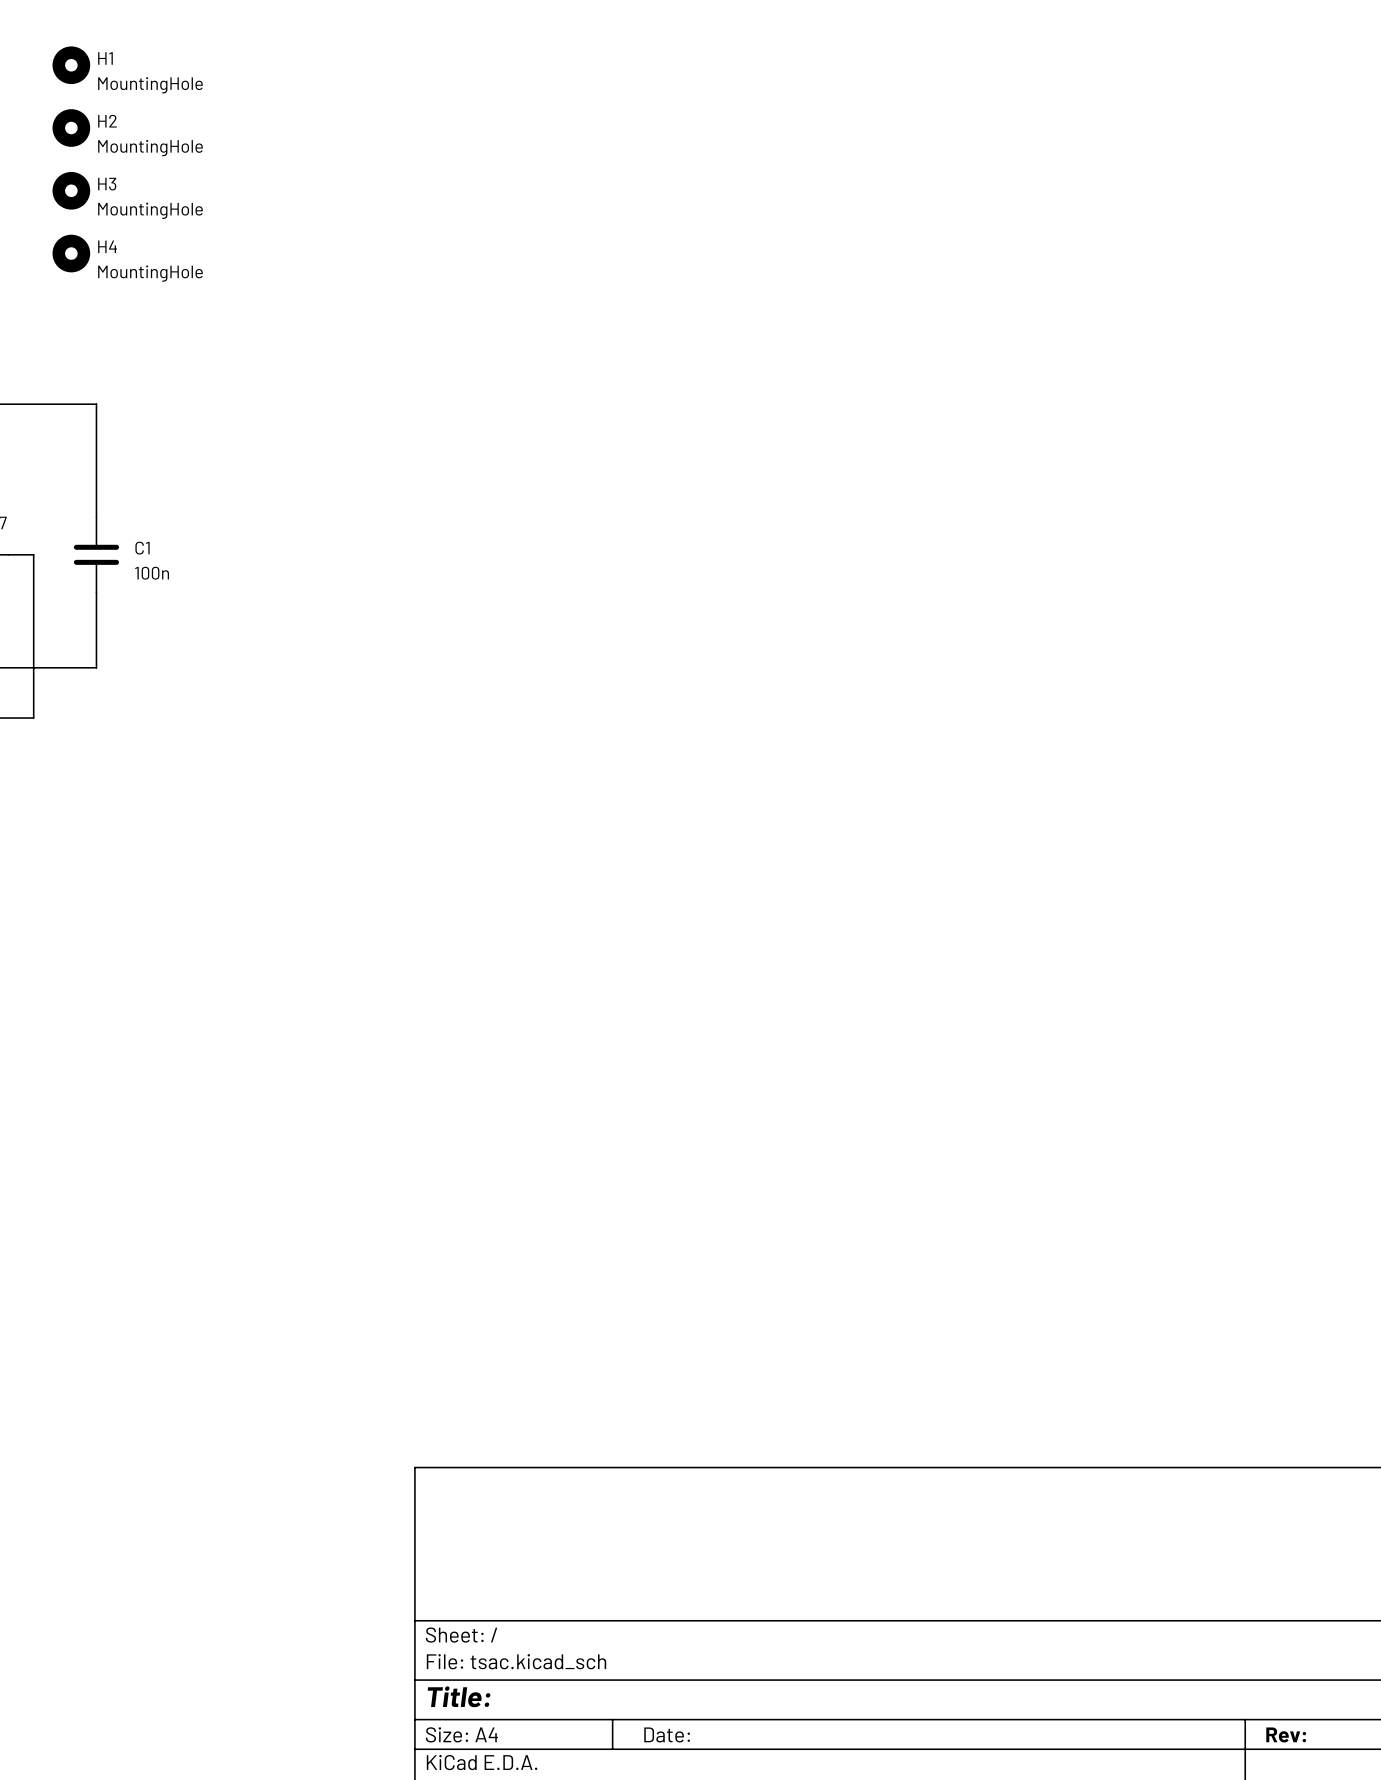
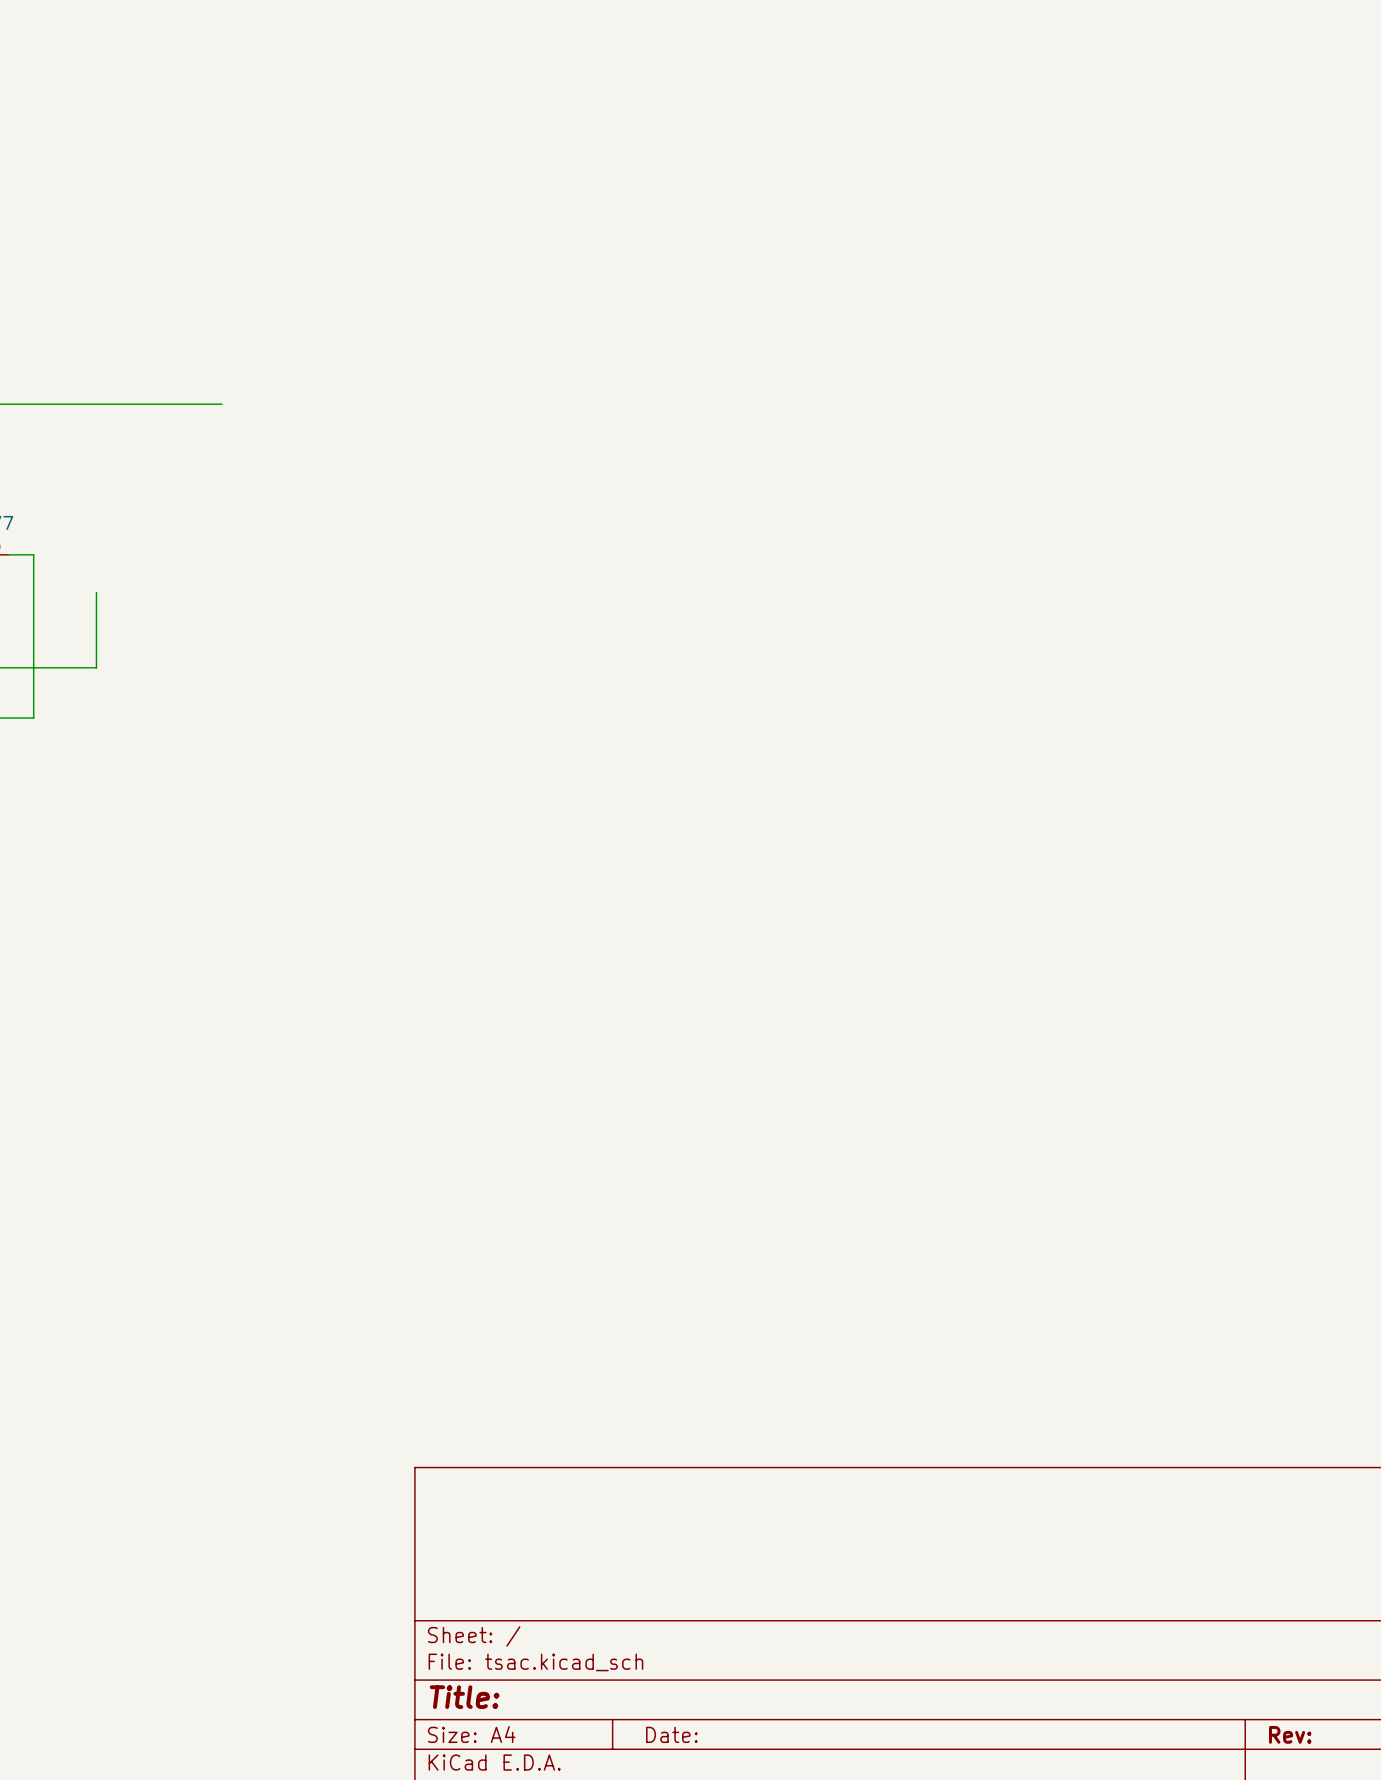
H1: MountingHole (71, 65) -> none
H2: MountingHole (71, 128) -> none
H3: MountingHole (71, 190) -> none
H4: MountingHole (71, 253) -> none
wire: (96, 404) (96, 517) -> (96, 404) (222, 404)
C1: 100n (96, 554) -> none

